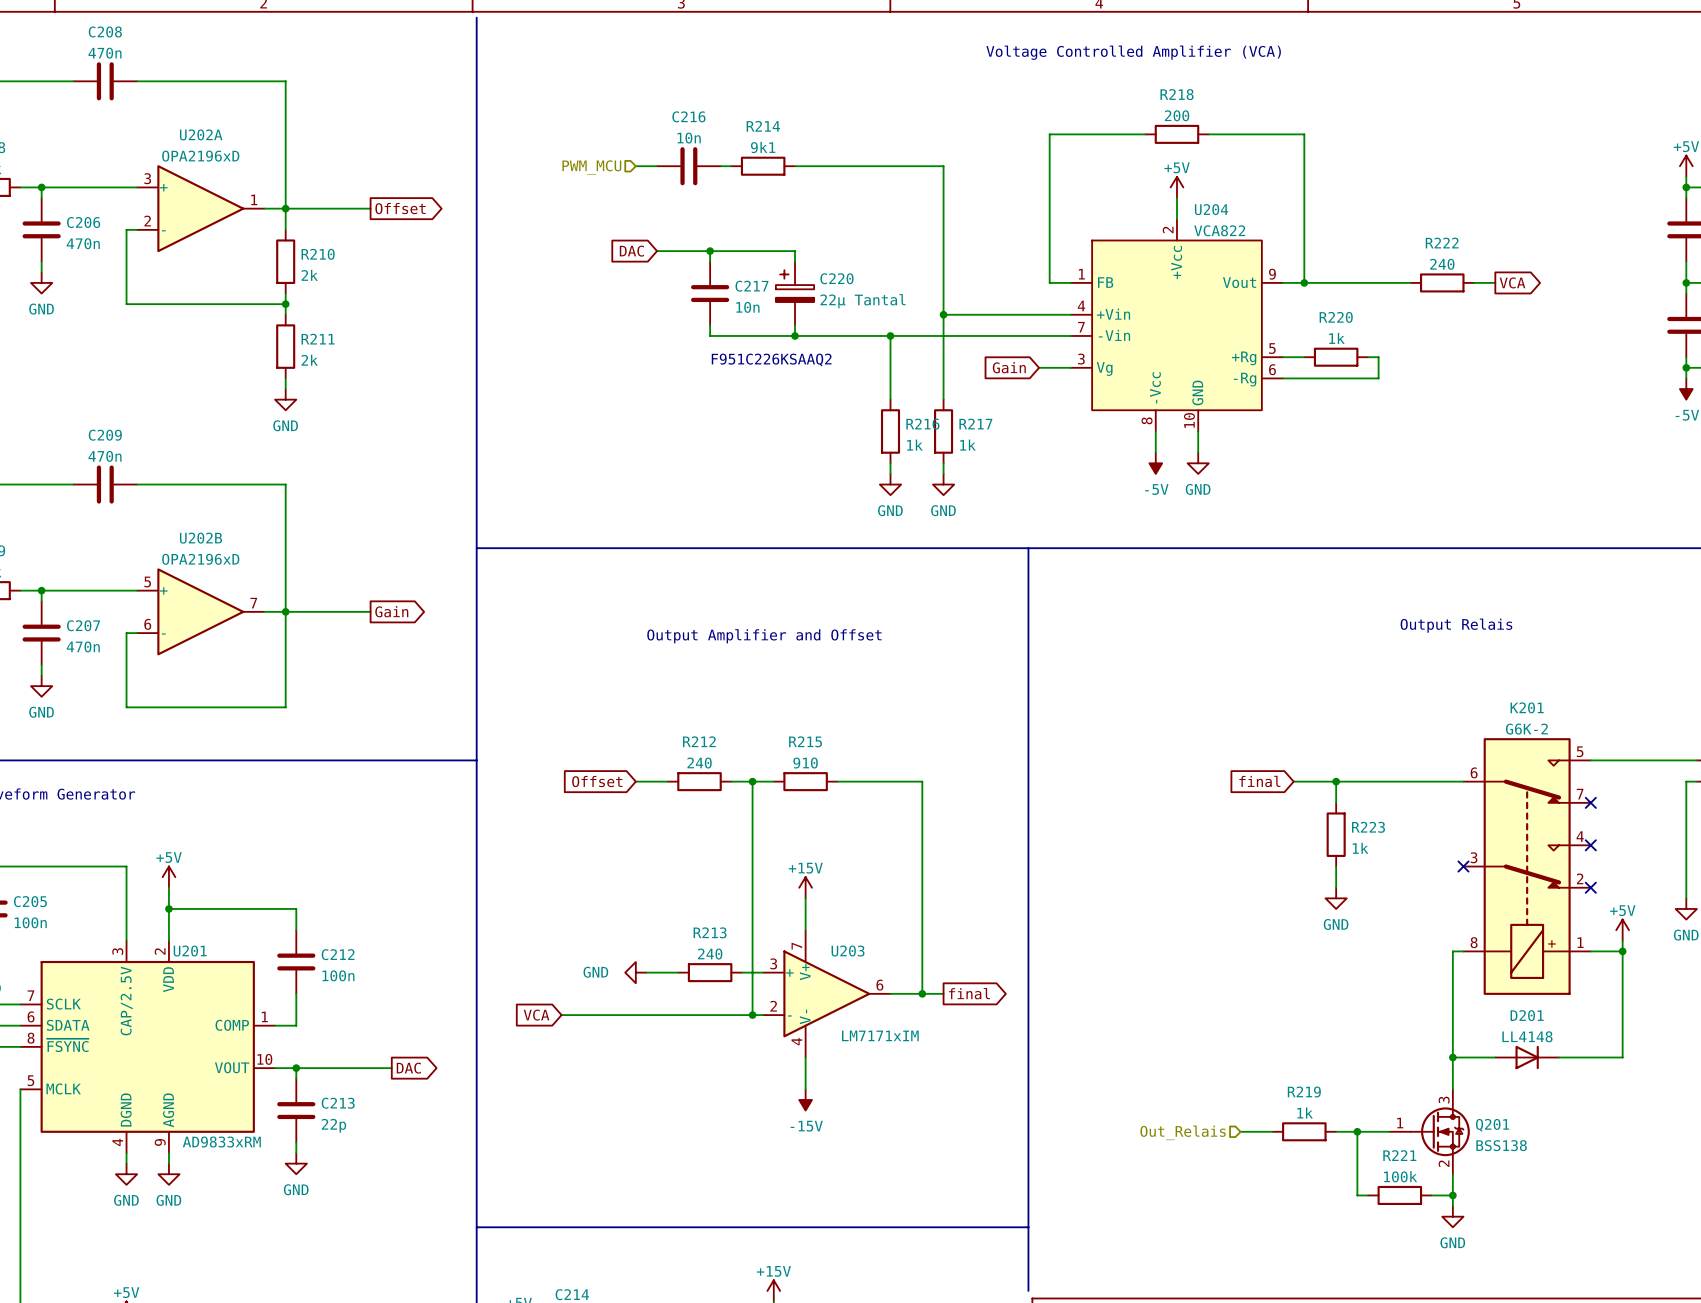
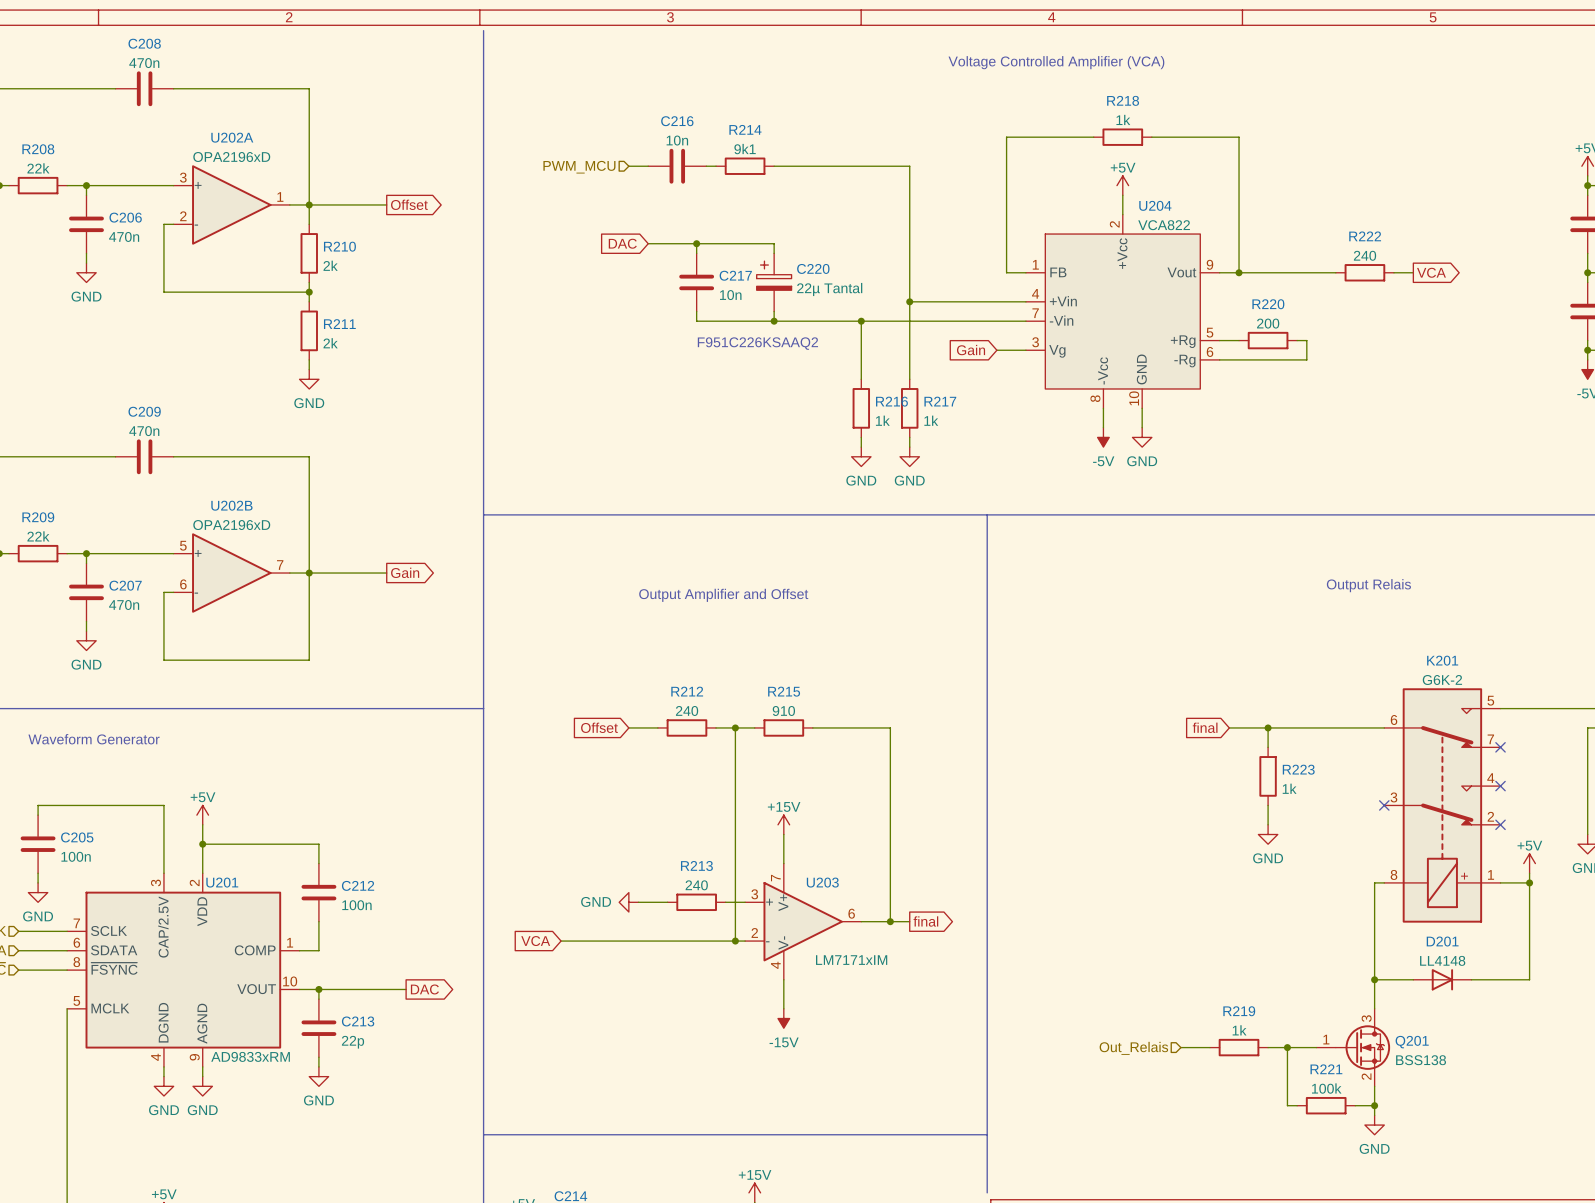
R218 value: 200 (1177, 115) -> 1k (1123, 119)
R220 value: 1k (1336, 338) -> 200 (1268, 323)

